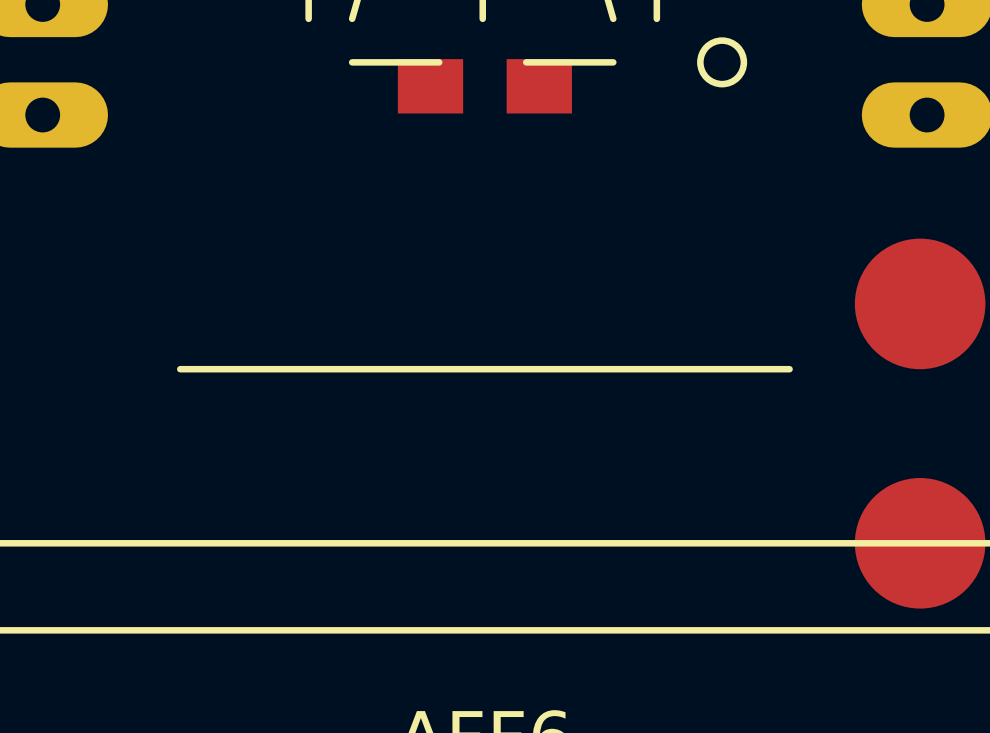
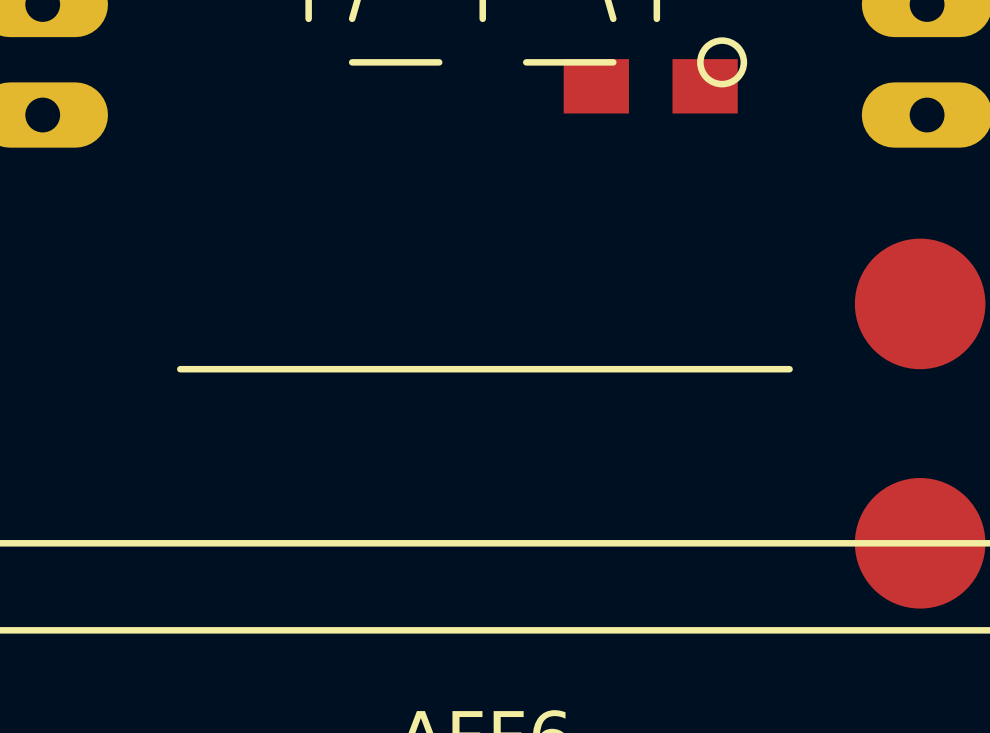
part position: (484, 86) -> (650, 86)

